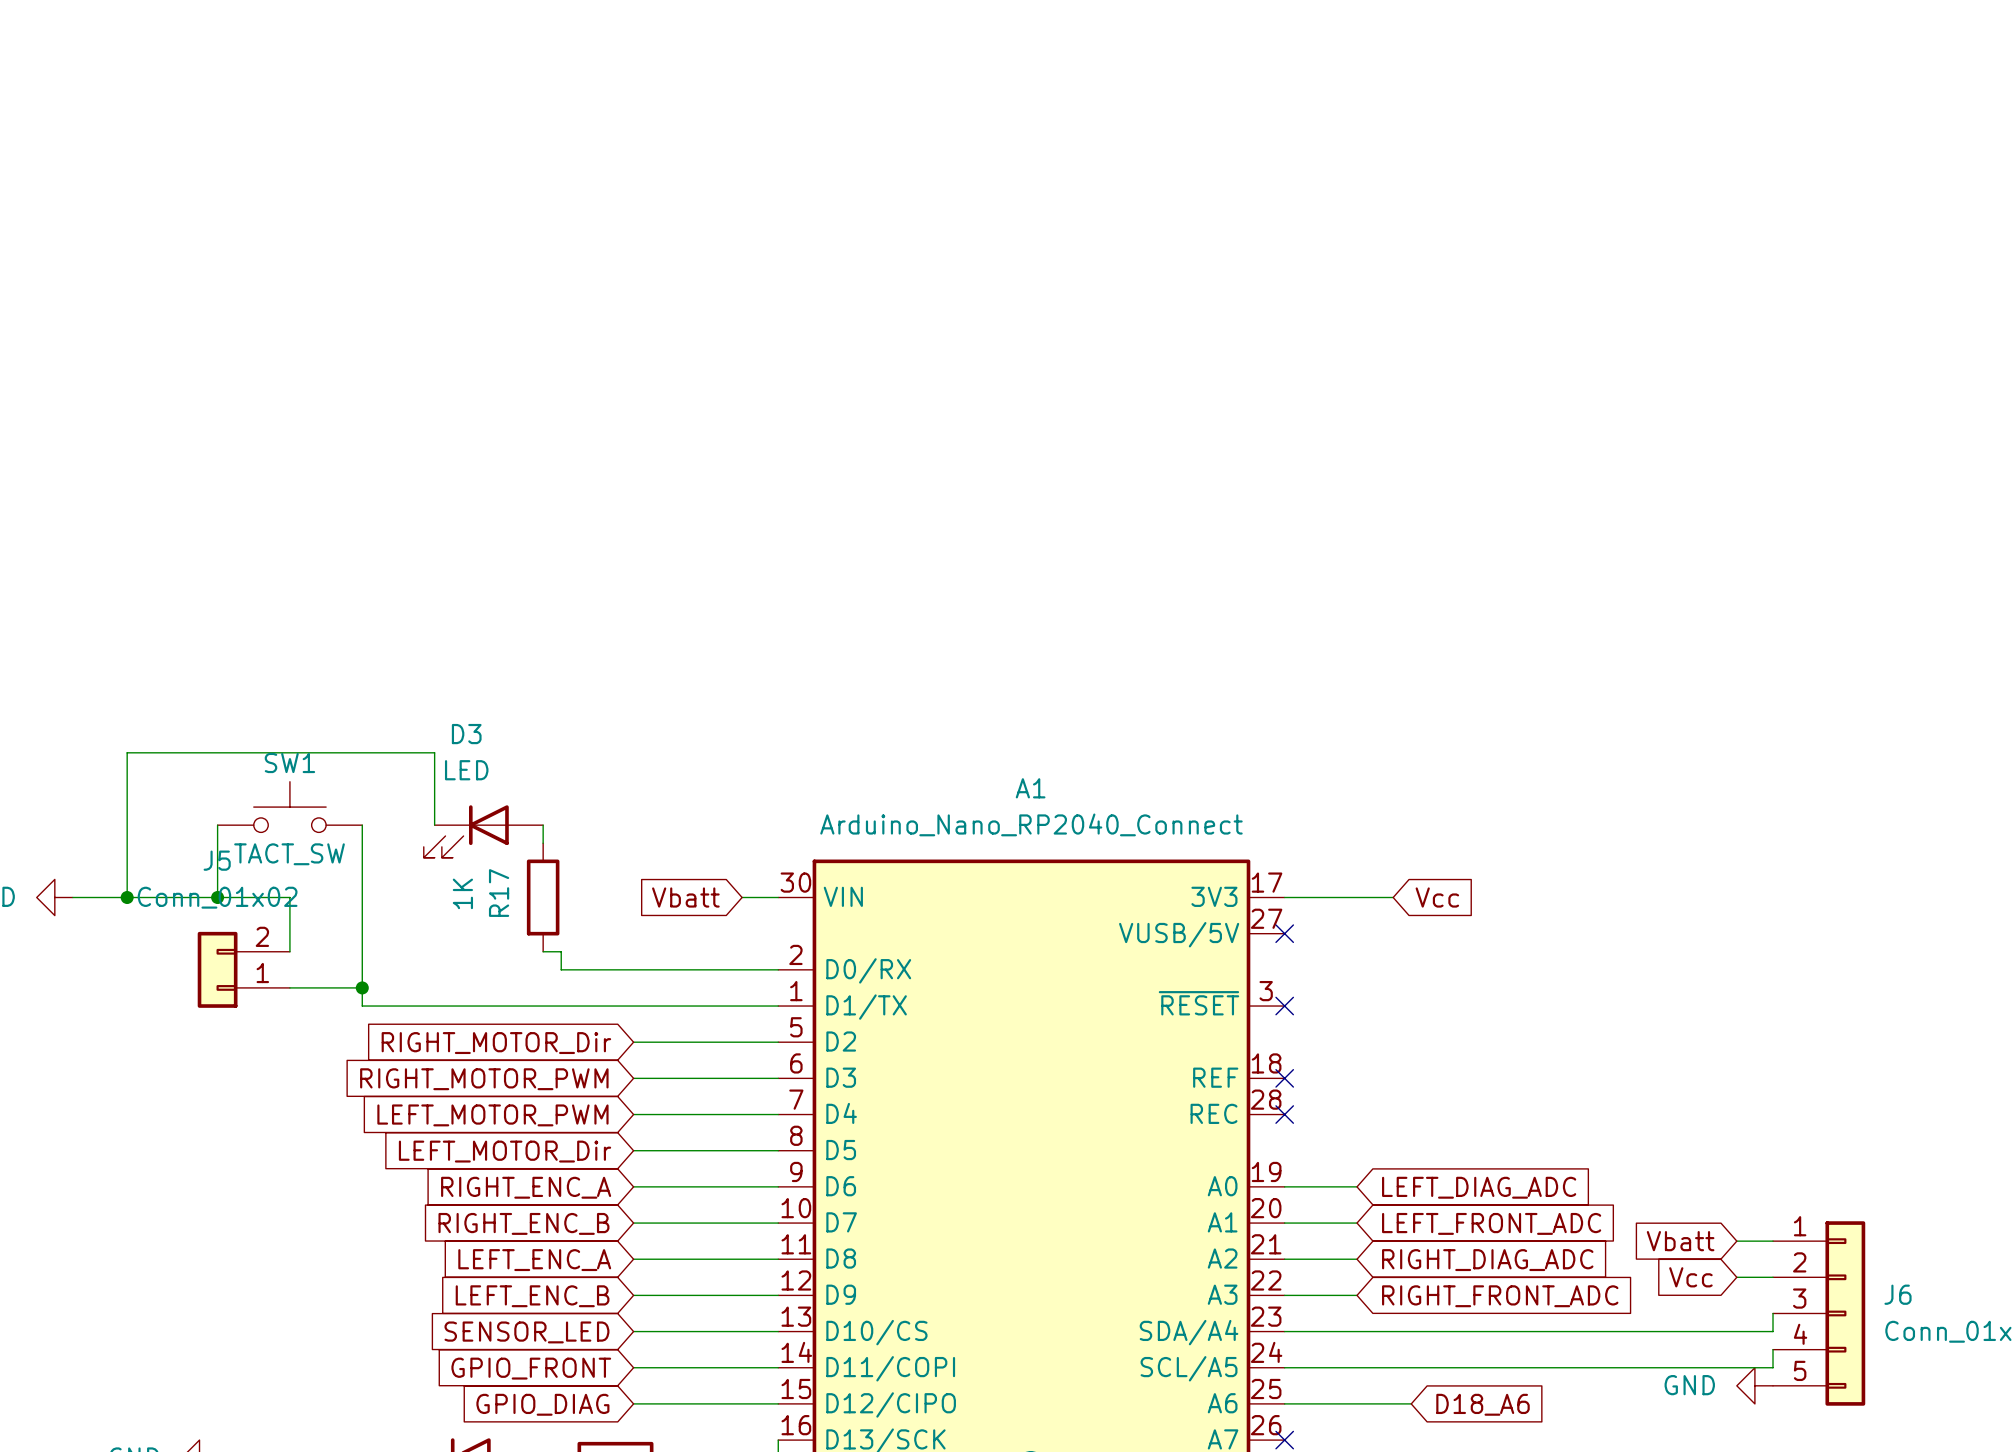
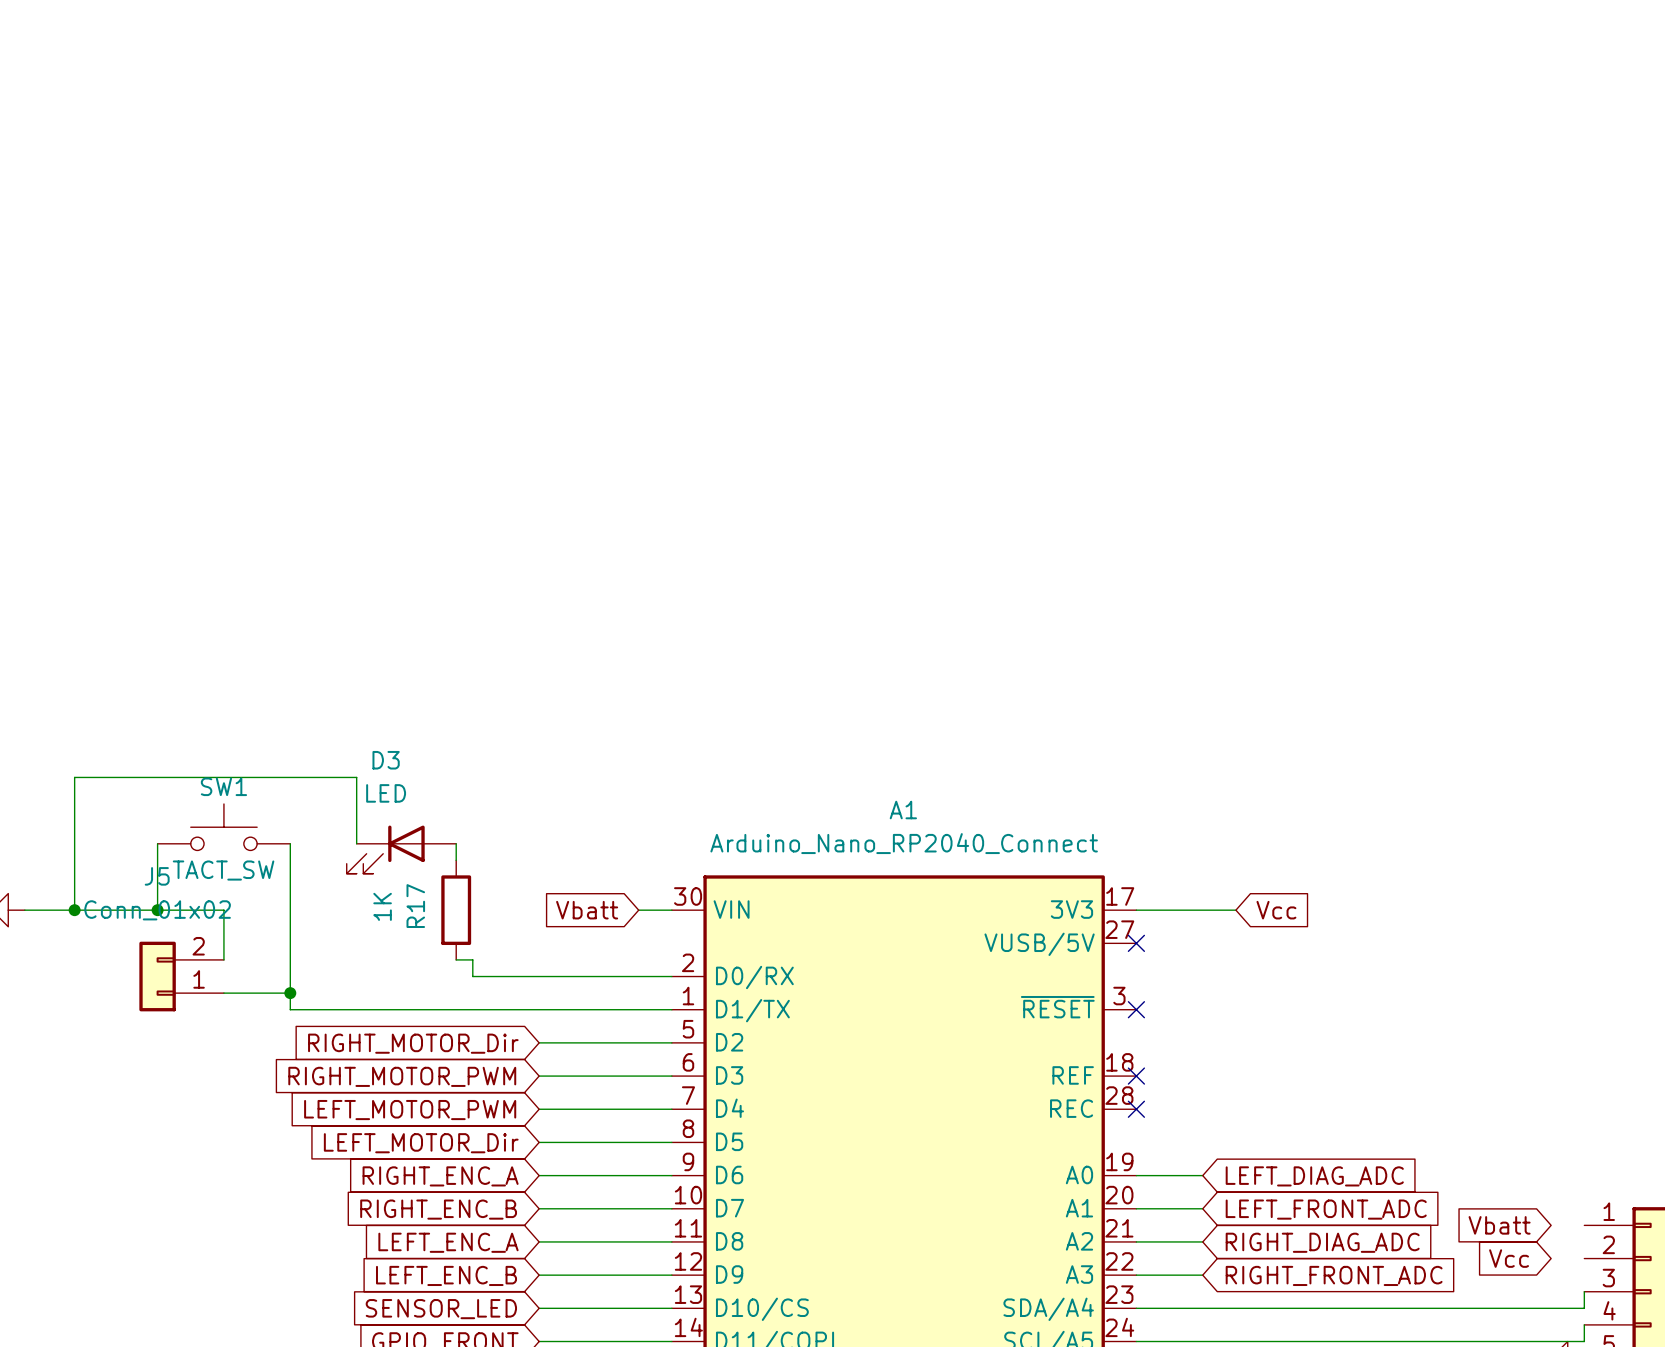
wire: (1736, 1241) (1773, 1241) -> none
wire: (1736, 1277) (1773, 1277) -> none

